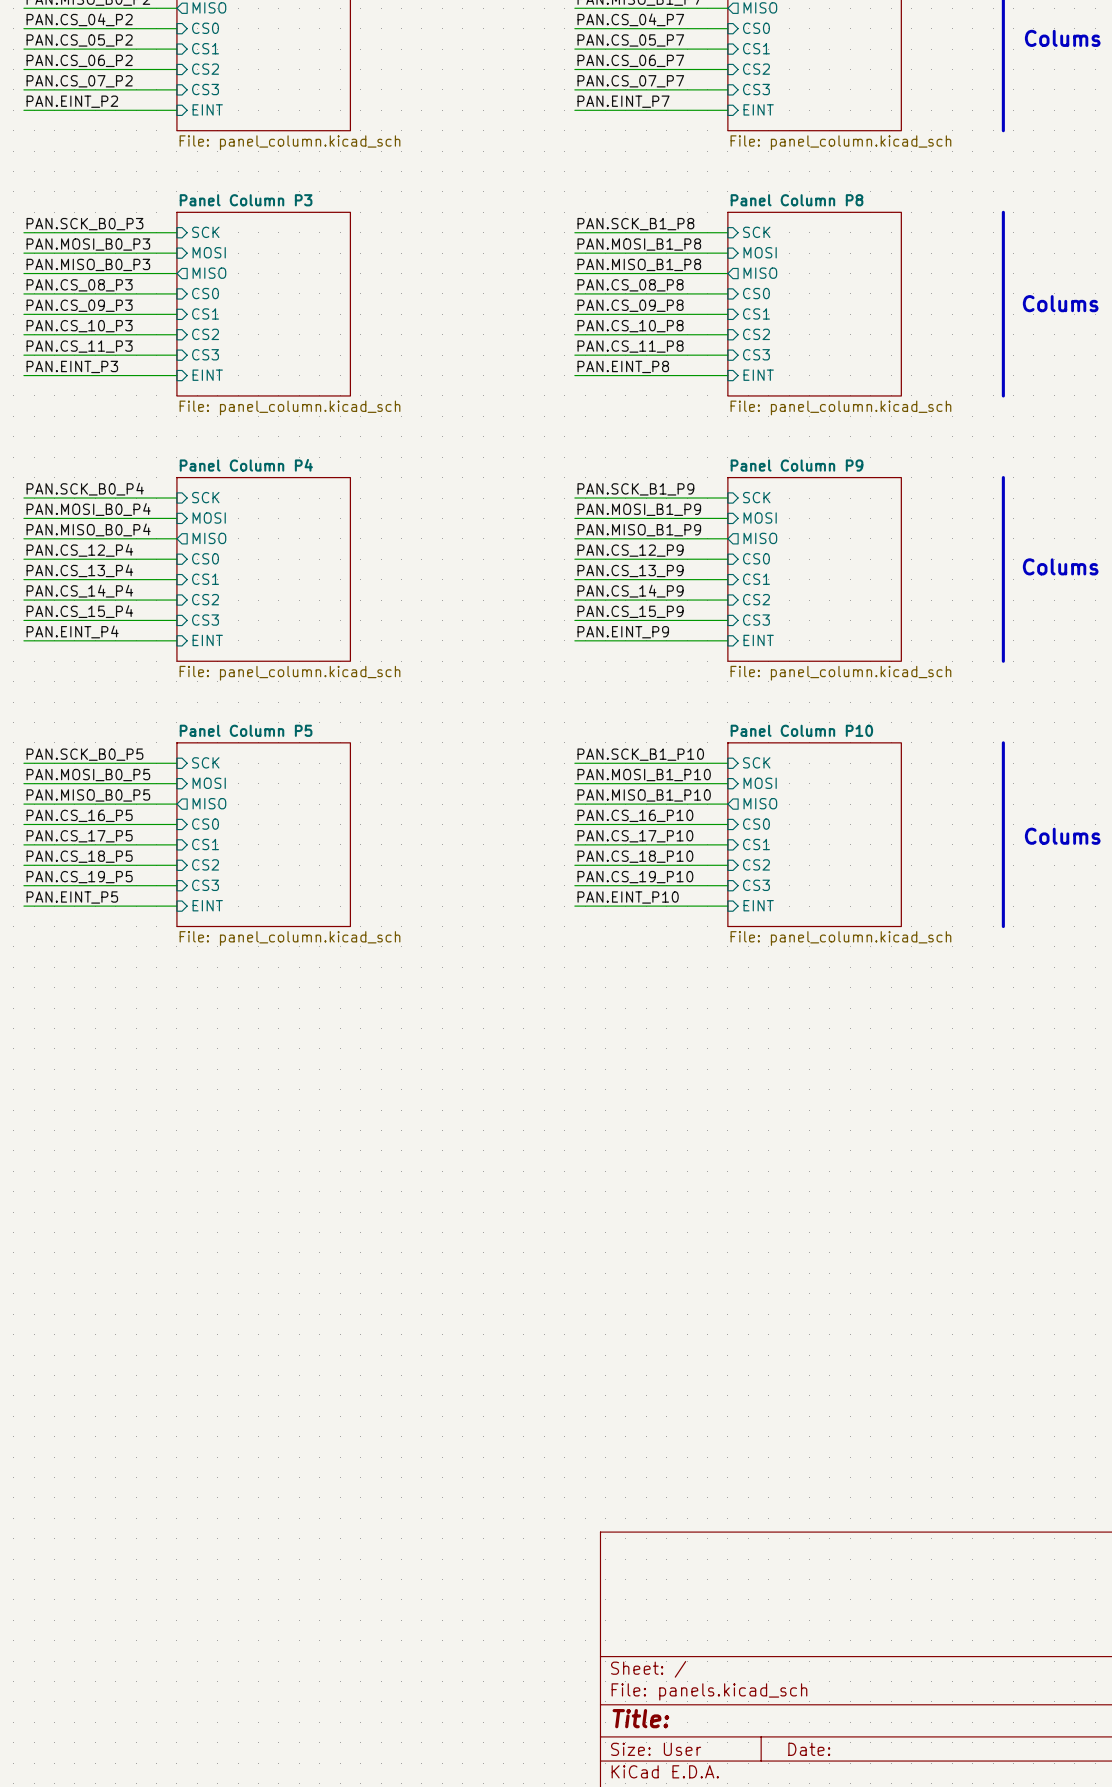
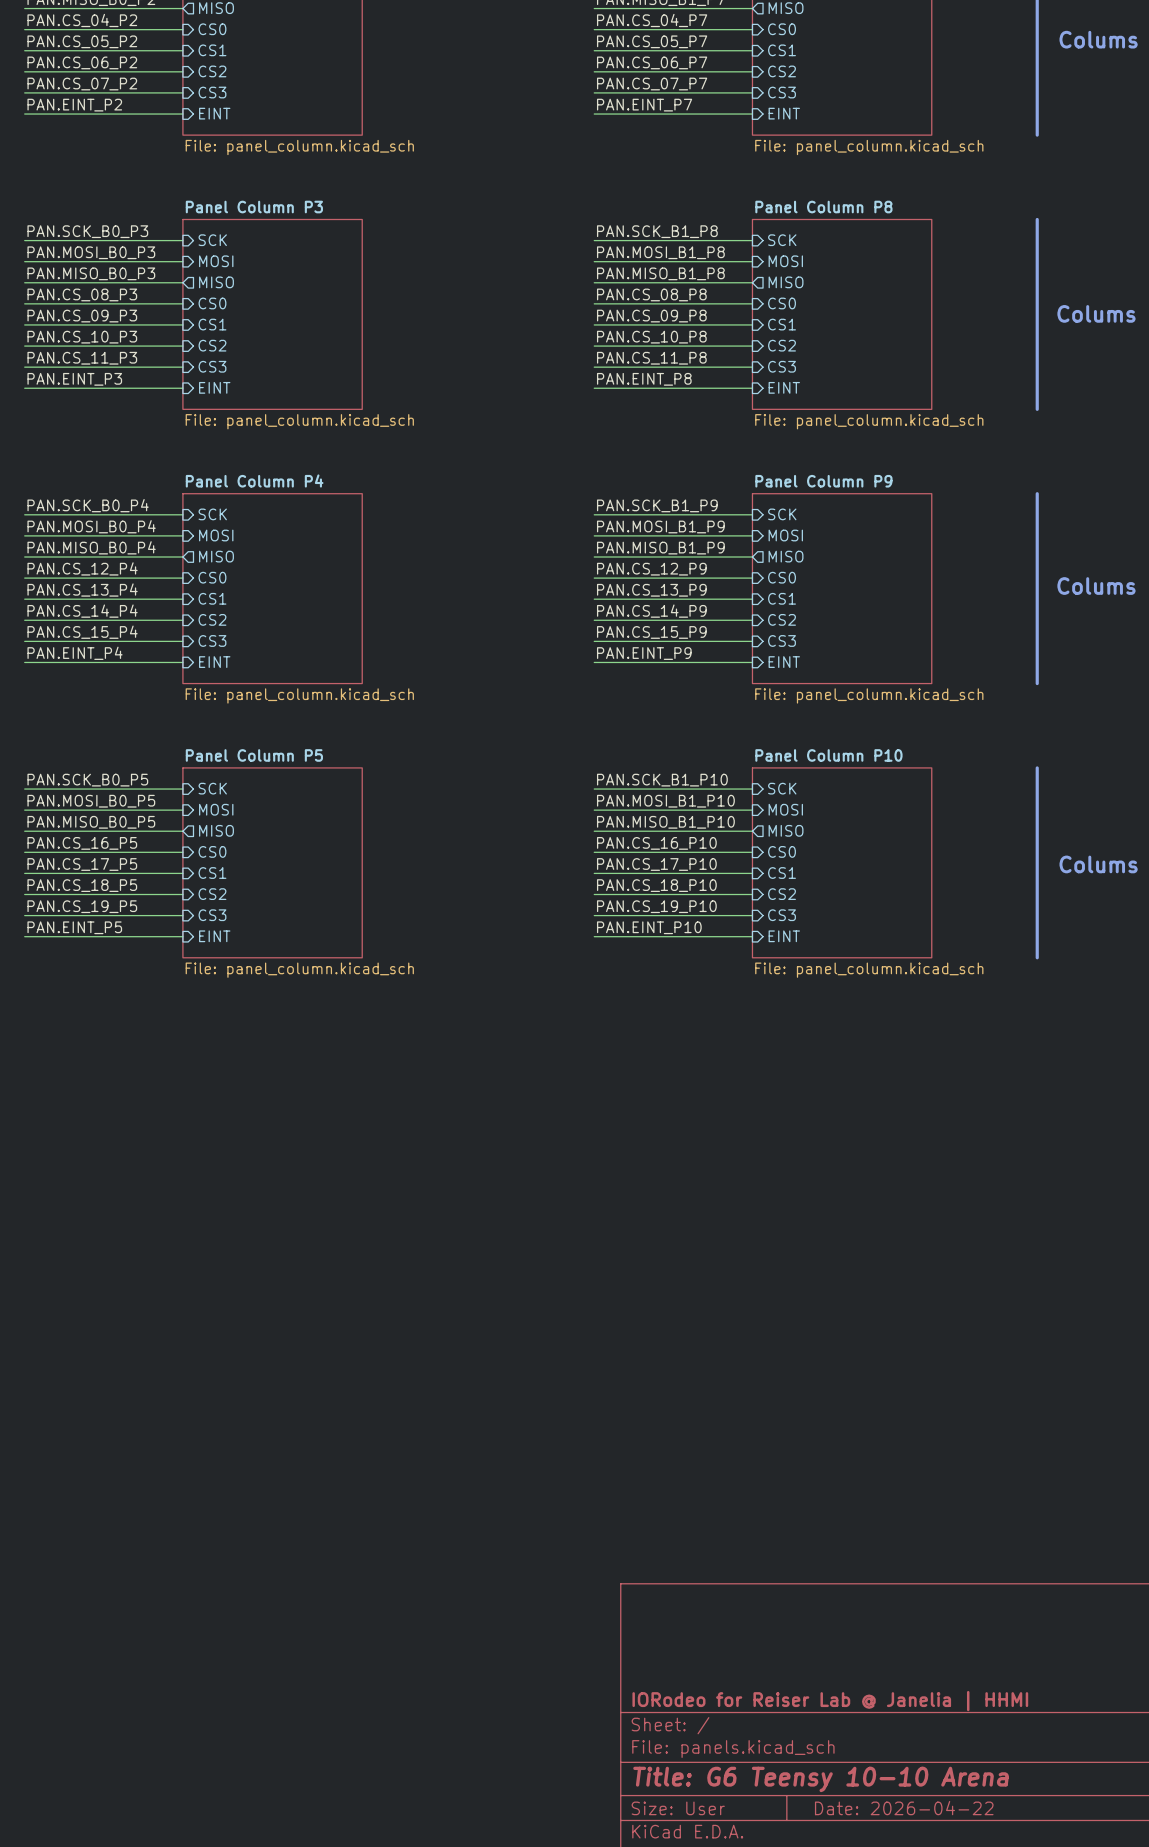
title block: none -> IORodeo for Reiser Lab @ Janelia | HHMI (830, 1701)
title block: Title: (640, 1718) -> Title: G6 Teensy 10-10 Arena (821, 1779)
title block: Date: (809, 1749) -> Date: 2026-04-22 (904, 1808)

